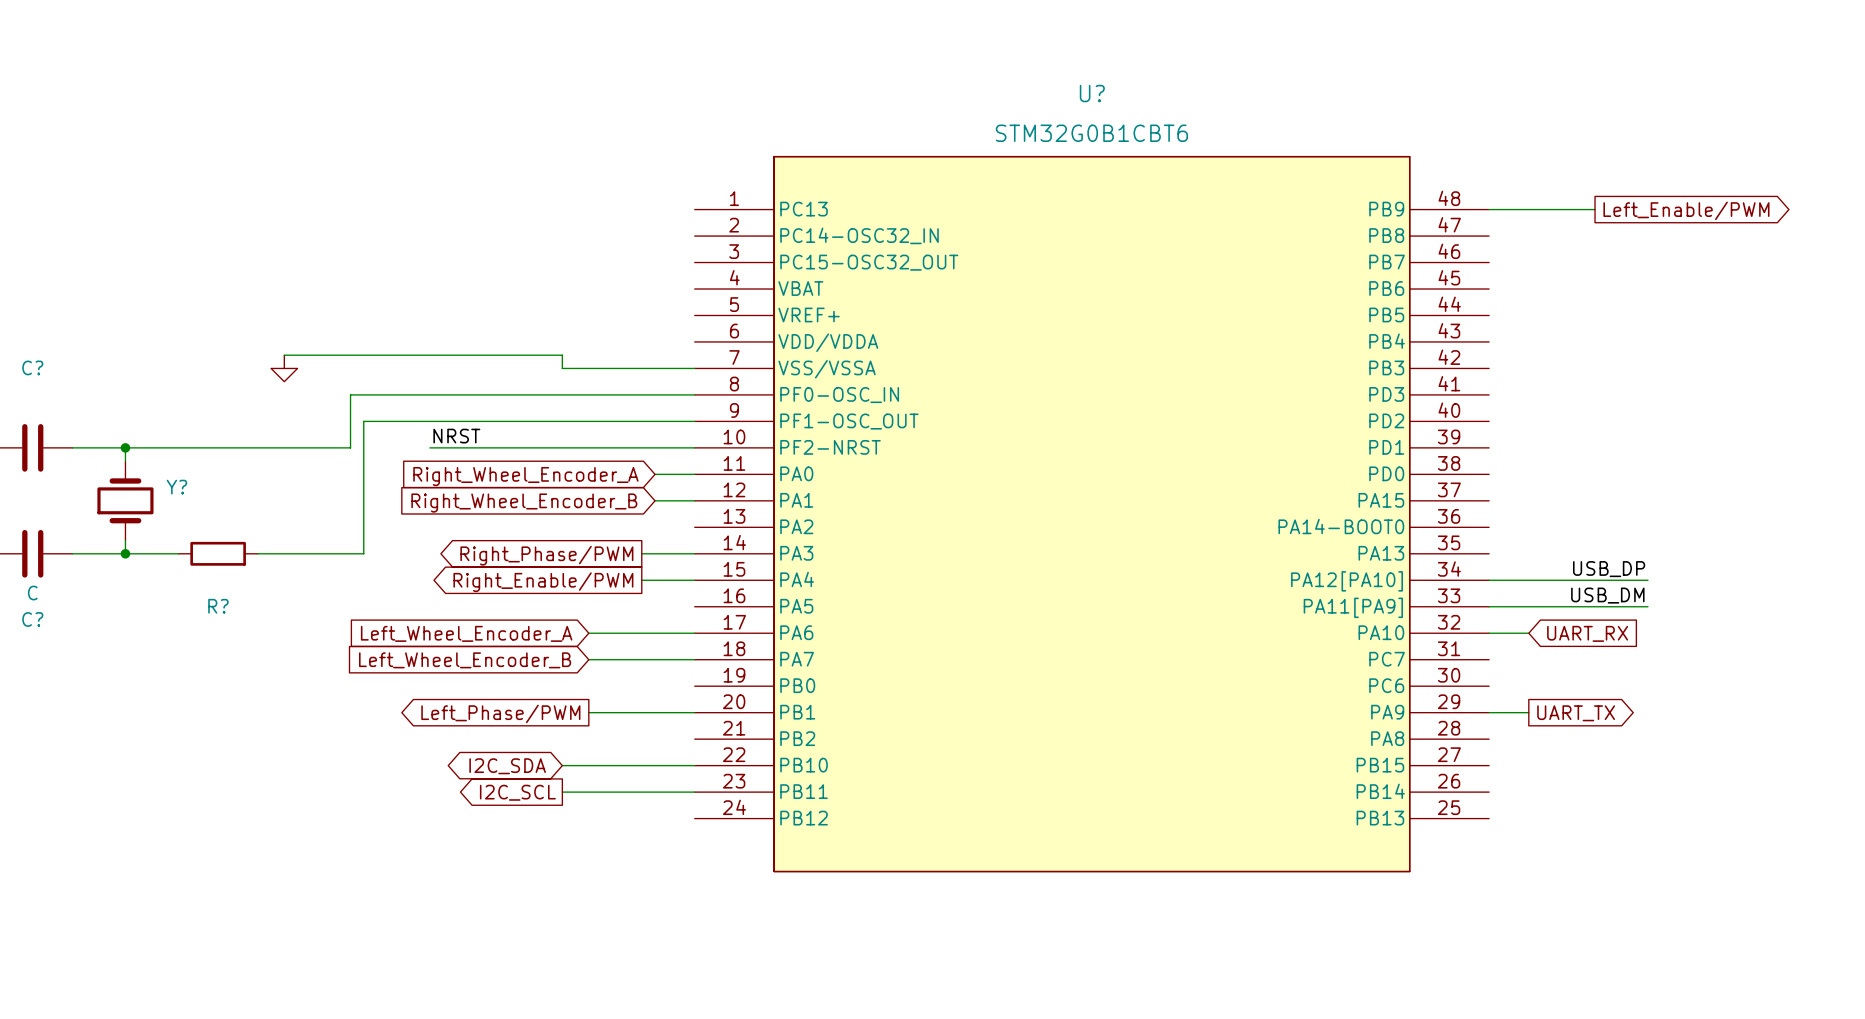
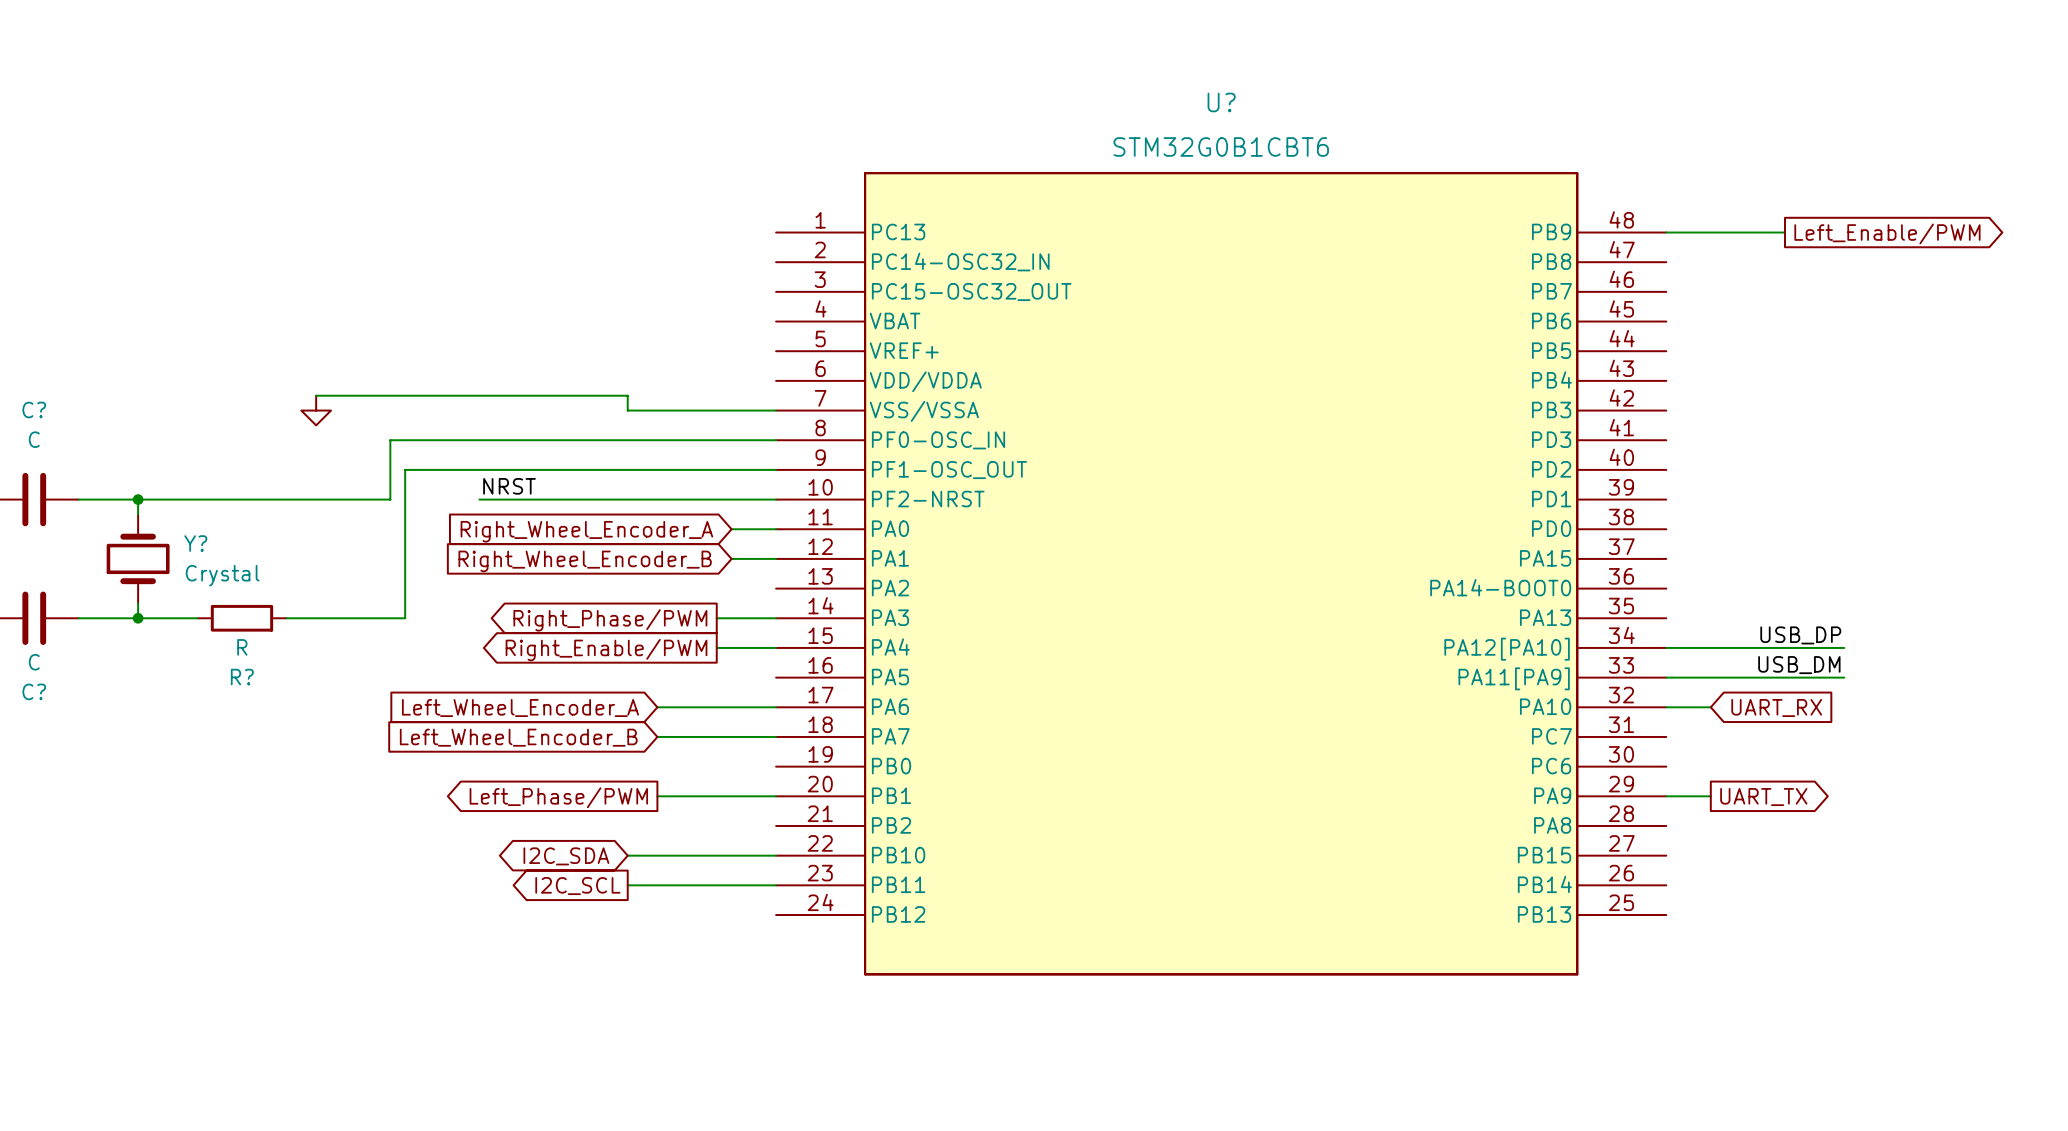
C? value: none -> C (34, 439)
Y? value: none -> Crystal (222, 575)
R? value: none -> R (242, 647)

